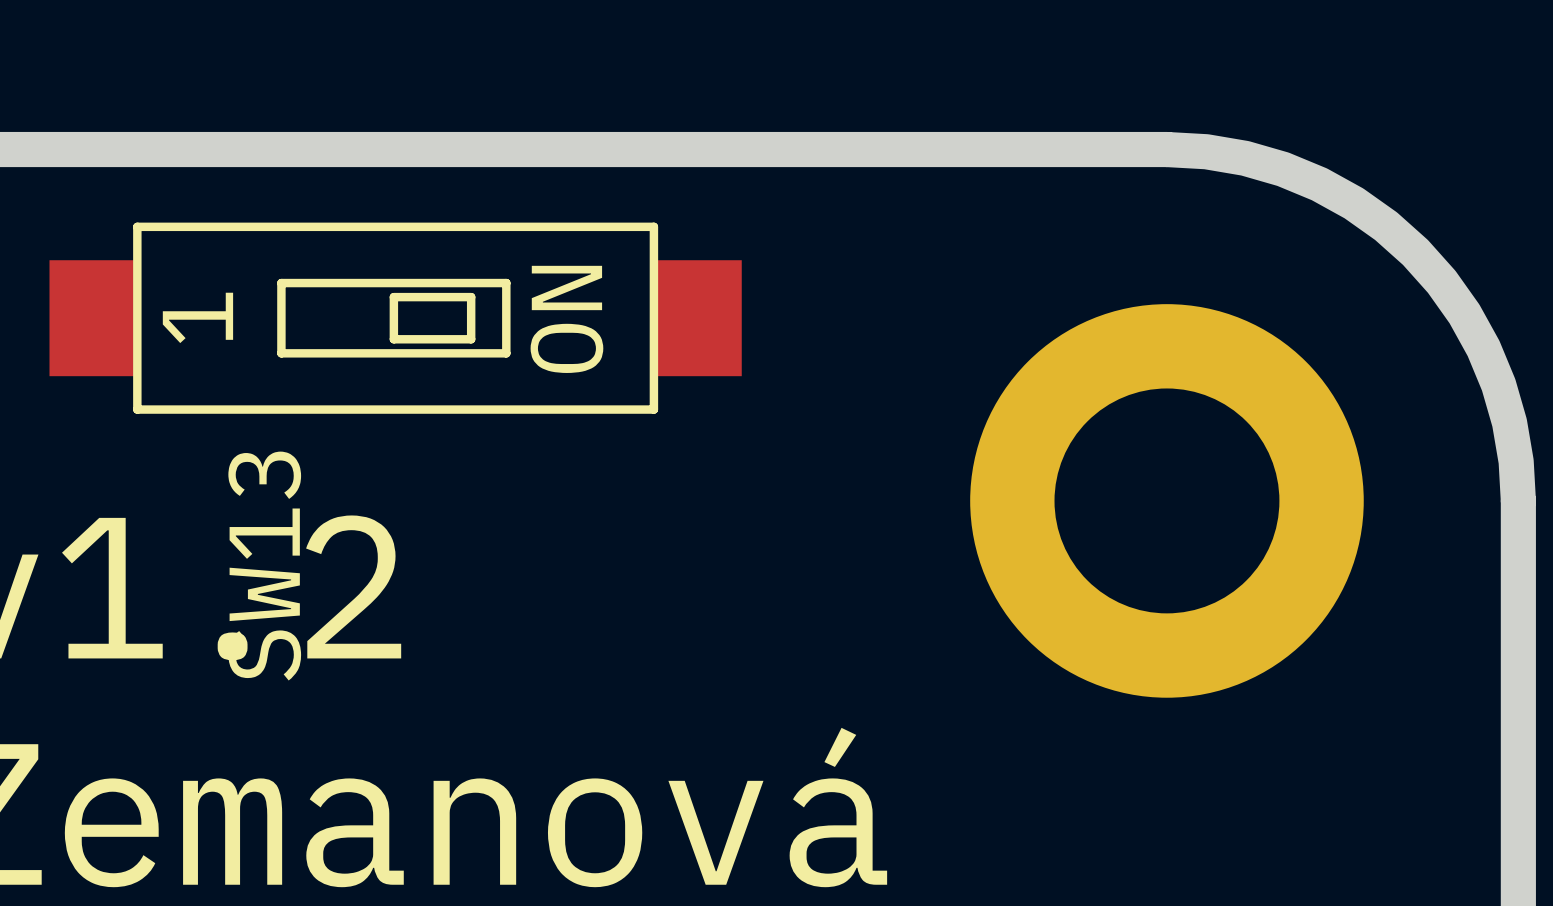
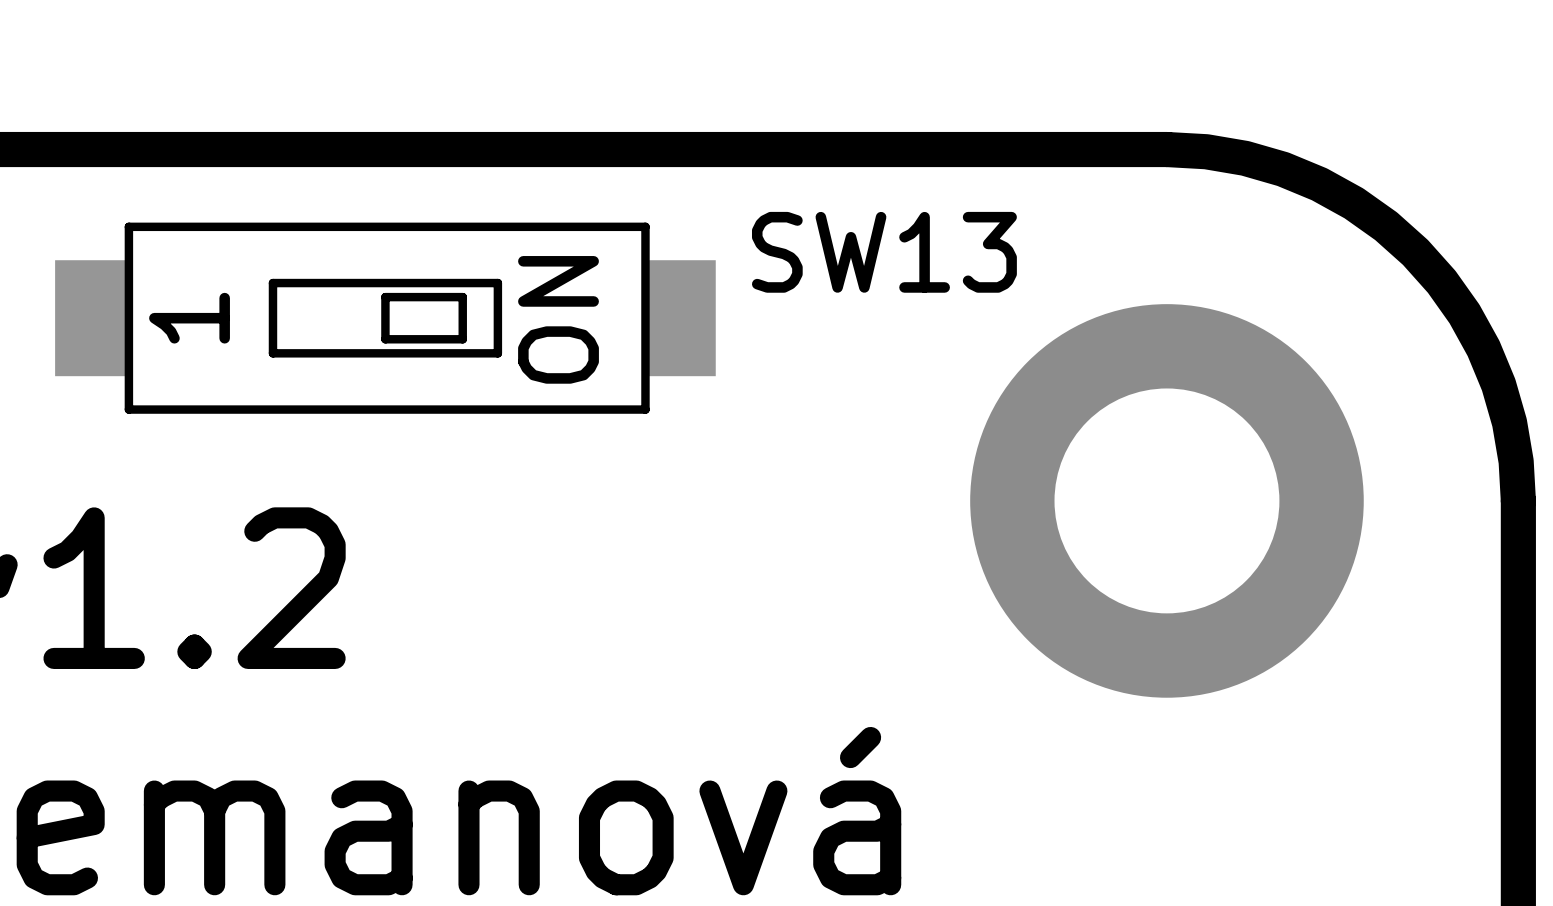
SW13 footprint: [49, 222, 742, 414] -> [55, 222, 716, 414]
SW13 name position: SW13 (264, 566) -> SW13 (884, 252)

